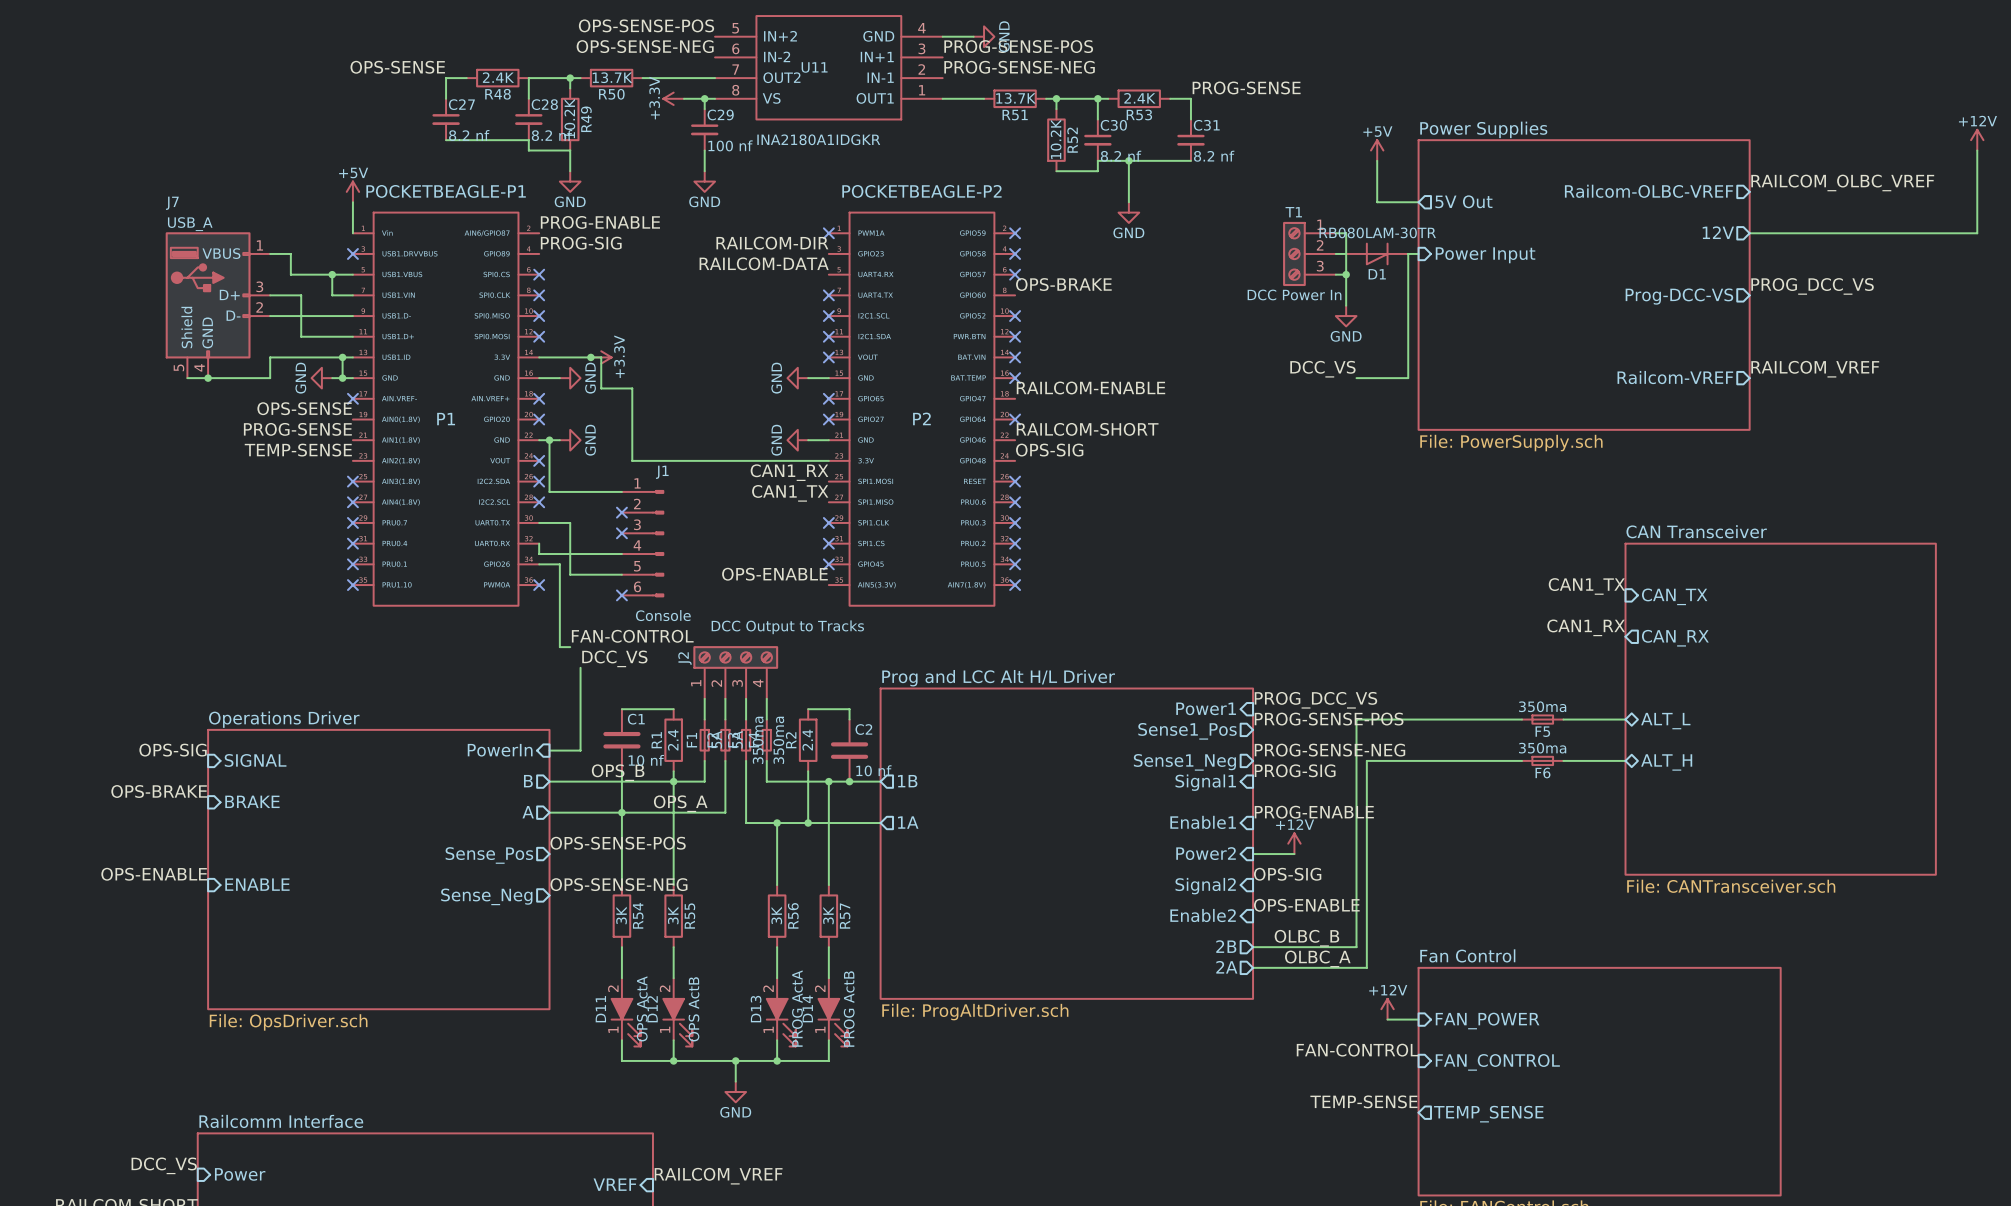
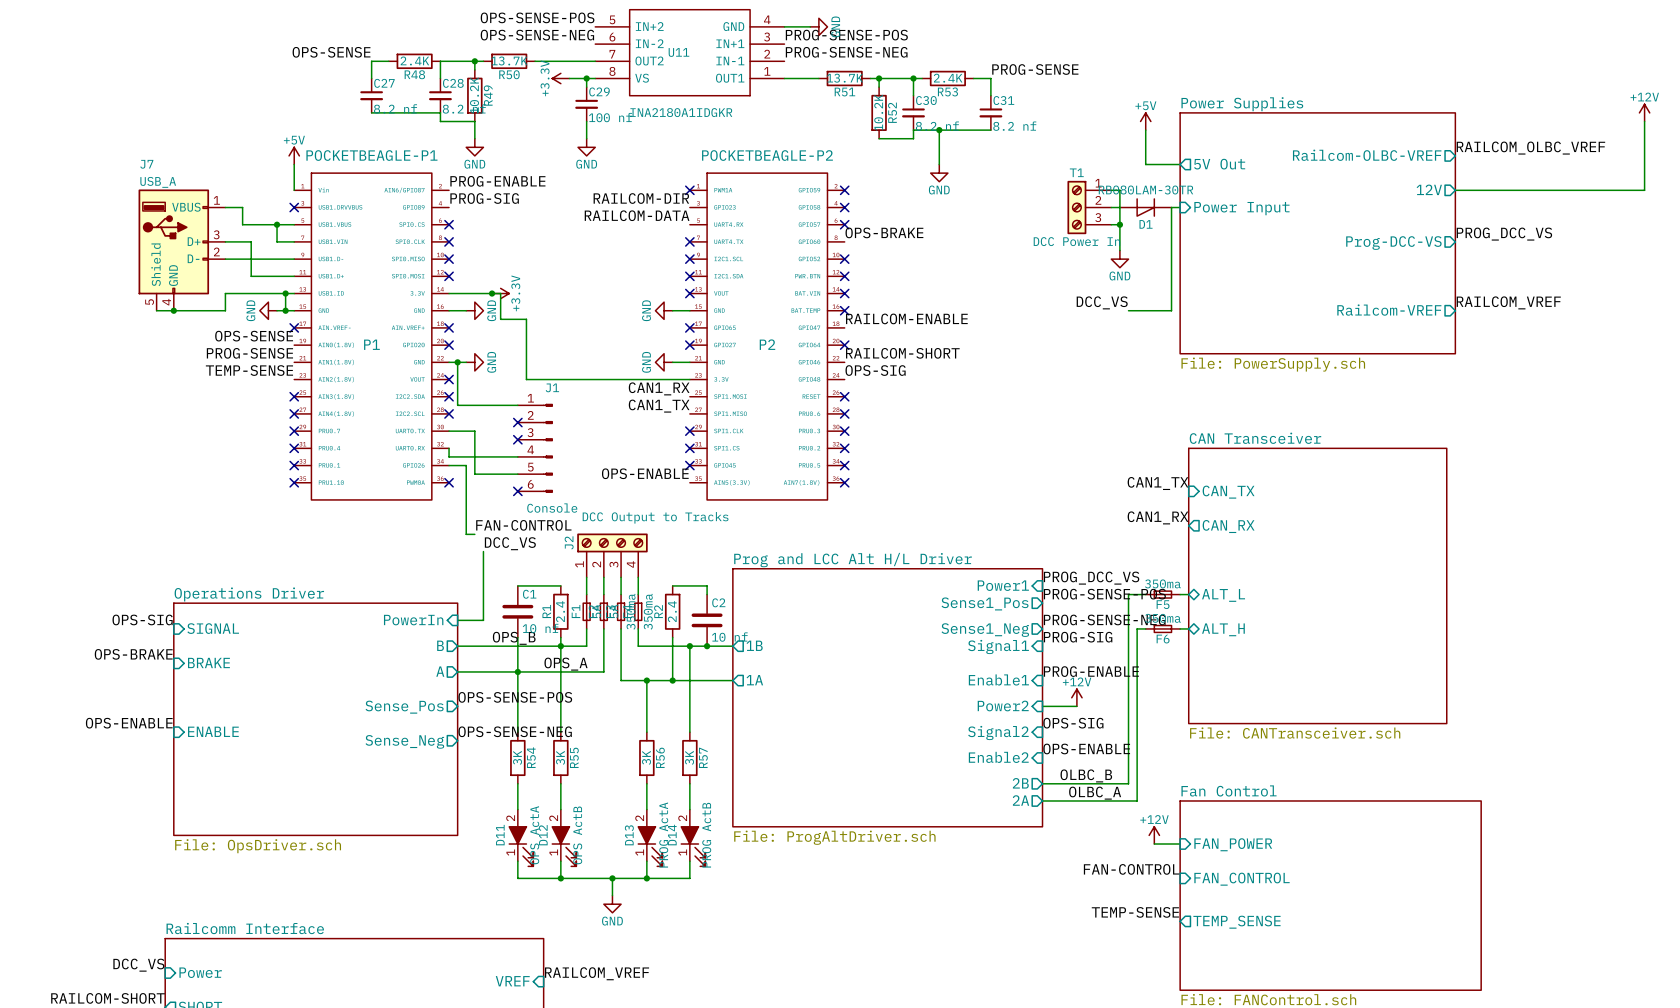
label position: CAN1_TX (1586, 586) -> CAN1_TX (1158, 483)
sheet pin position: CAN_TX (1674, 596) -> CAN_TX (1228, 492)
label position: CAN1_RX (1586, 627) -> CAN1_RX (1158, 517)
sheet pin position: CAN_RX (1675, 638) -> CAN_RX (1228, 526)
sheet CAN Transceiver position: (1780, 709) -> (1317, 585)
wire: (1428, 719) (1522, 719) -> none
F5 position: (1542, 719) -> (1162, 594)
wire: (1563, 719) (1625, 719) -> none
sheet pin position: ALT_L (1665, 721) -> ALT_L (1223, 595)
wire: (1428, 760) (1522, 760) -> none
F6 position: (1542, 760) -> (1162, 628)
wire: (1563, 760) (1625, 760) -> none
sheet pin position: ALT_H (1666, 762) -> ALT_H (1223, 629)

